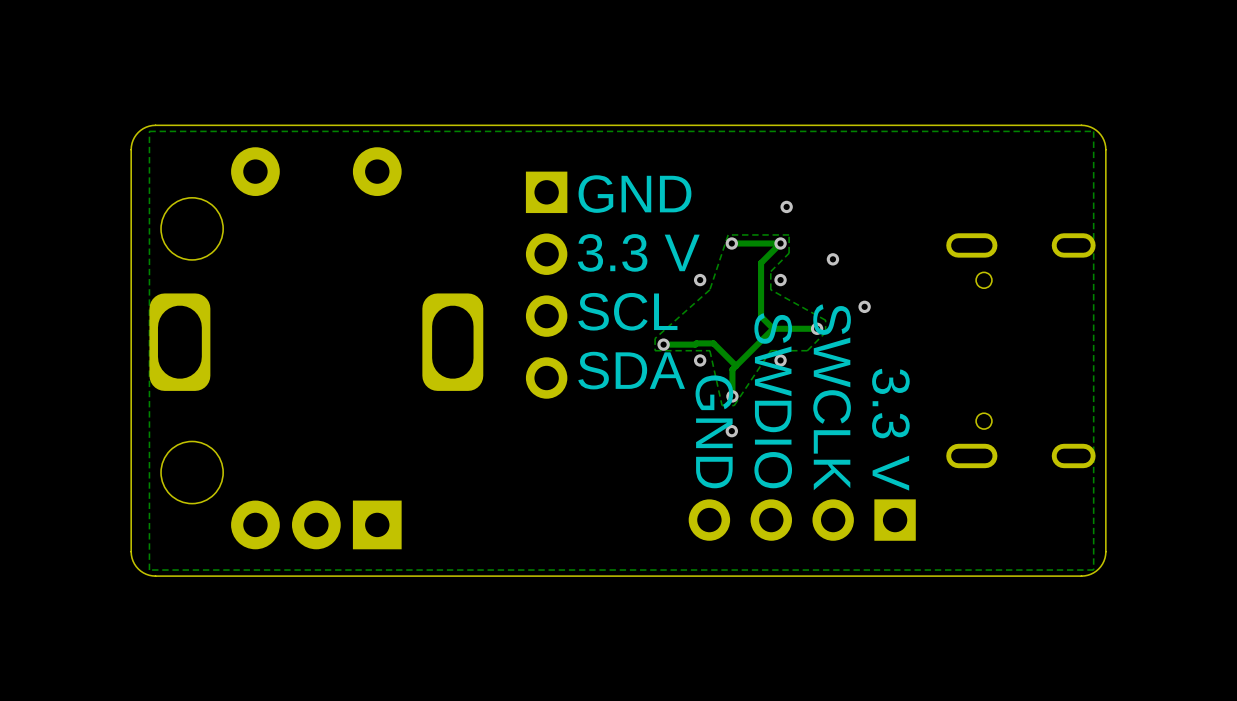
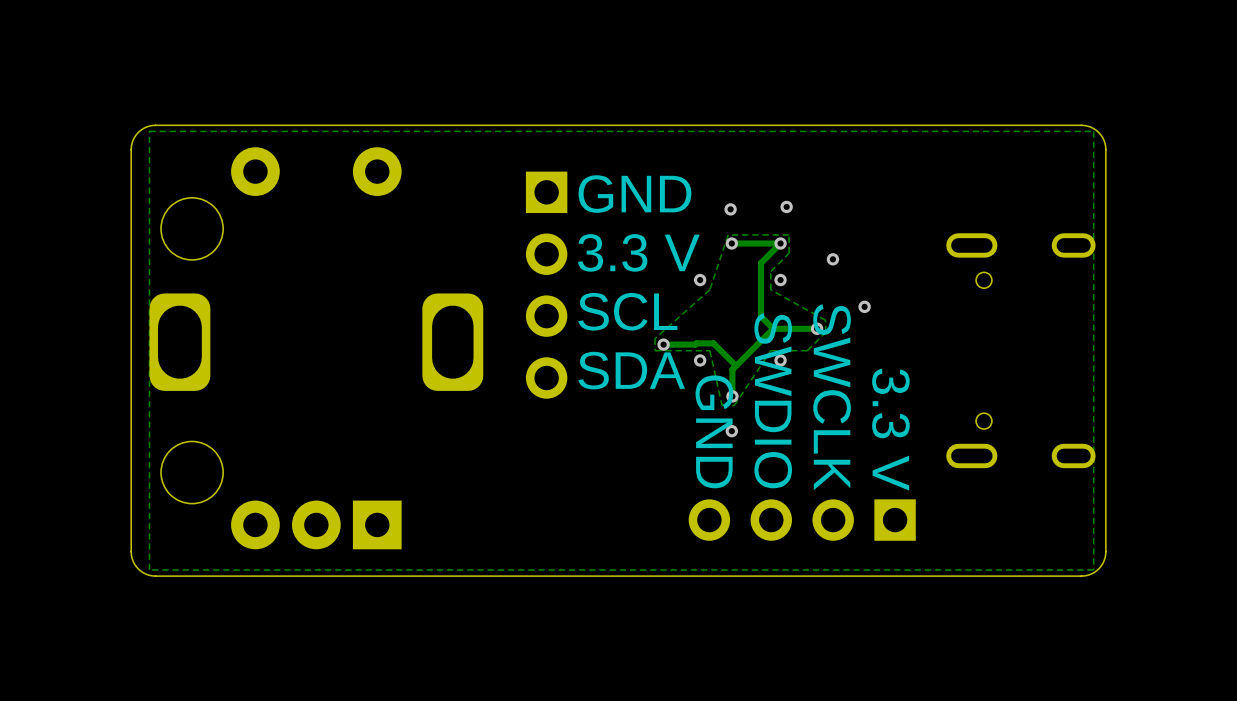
via: none -> (730, 209)

